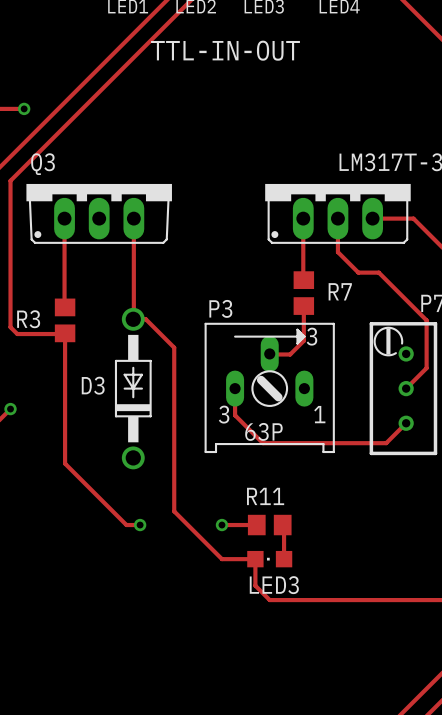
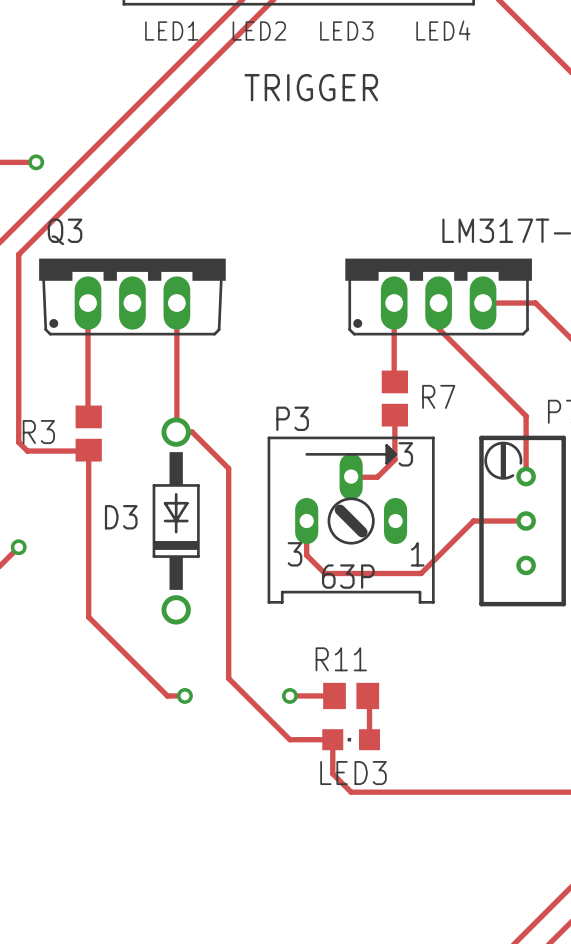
TTL-IN-OUT name: TTL-IN-OUT (225, 50) -> TRIGGER (311, 87)
track: (337, 238) (337, 252) (358, 272) (378, 272) (426, 320) (426, 368) (406, 388) -> (438, 328) (526, 416) (526, 476)
track: (406, 423) (386, 443) (262, 443) (249, 429) -> (526, 521) (473, 521) (421, 573) (324, 573)

